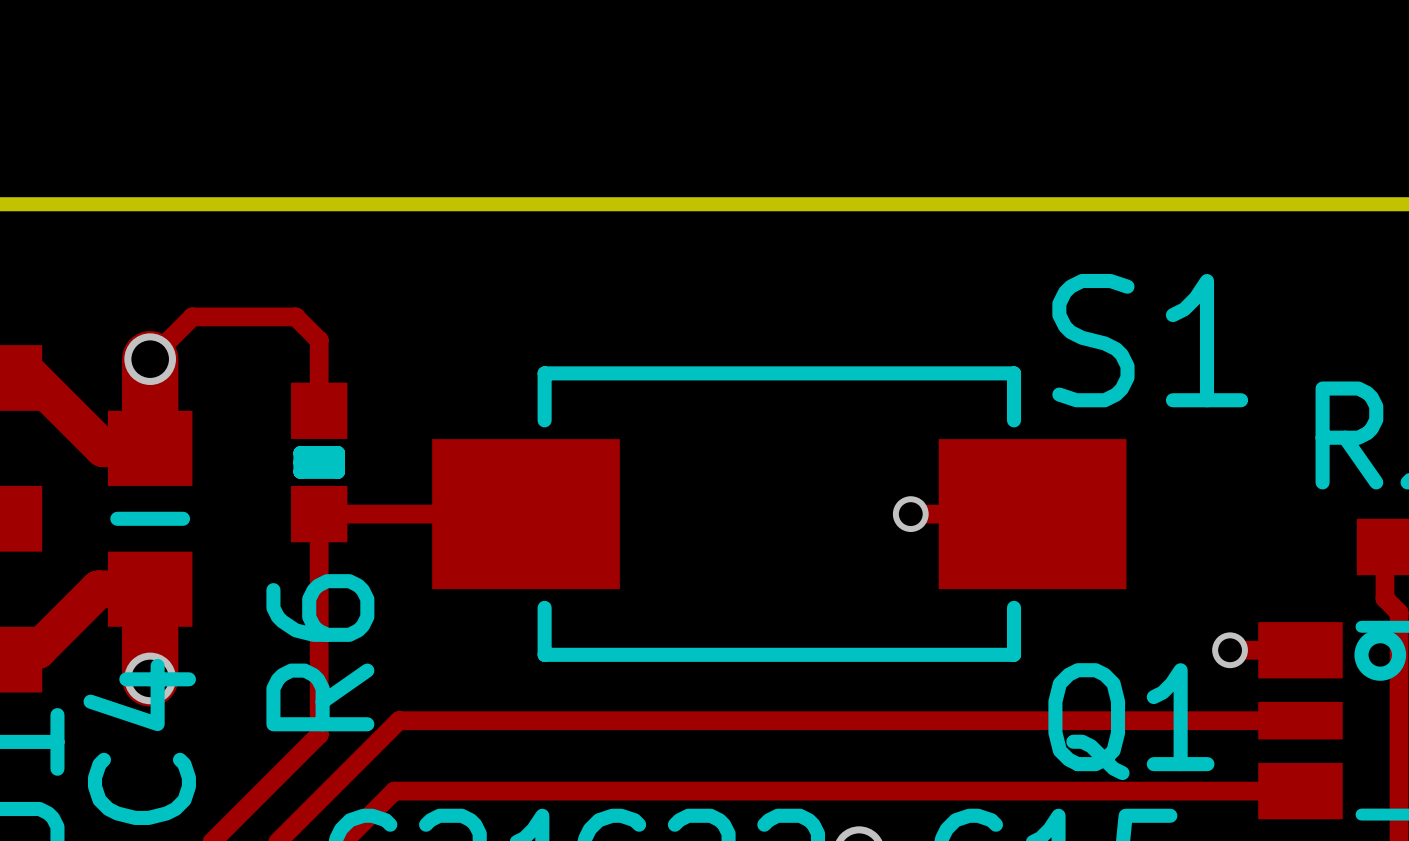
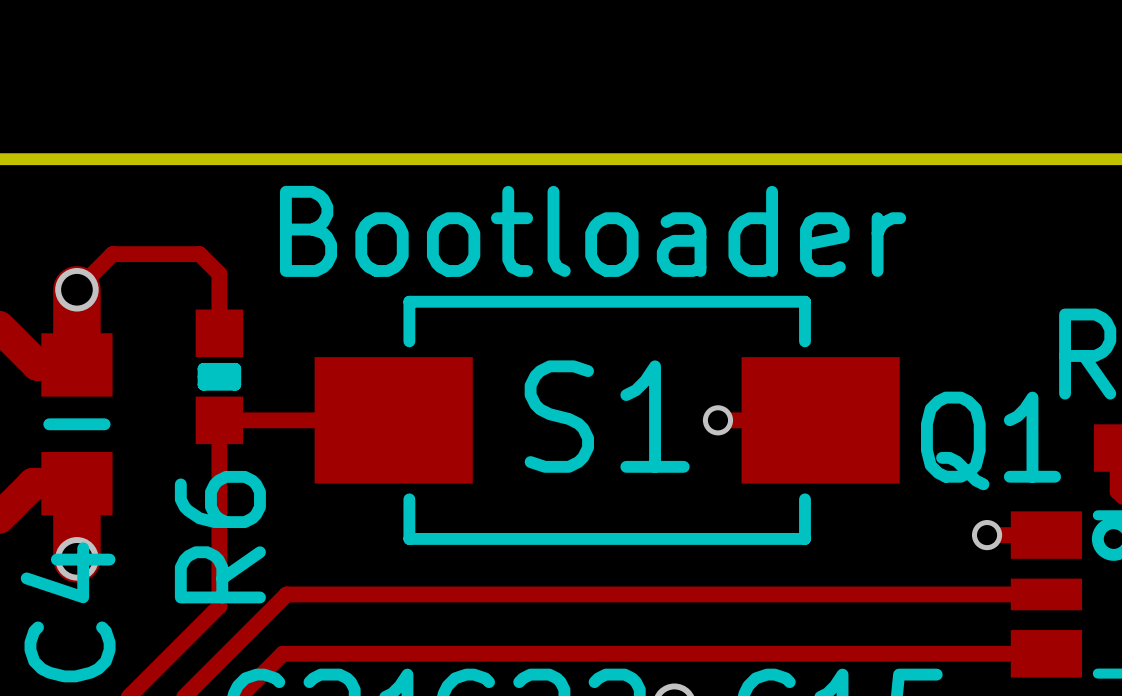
text: none -> Bootloader (593, 231)
S1 name position: S1 (1150, 340) -> S1 (607, 416)
Q1 name position: Q1 (1131, 721) -> Q1 (991, 440)

